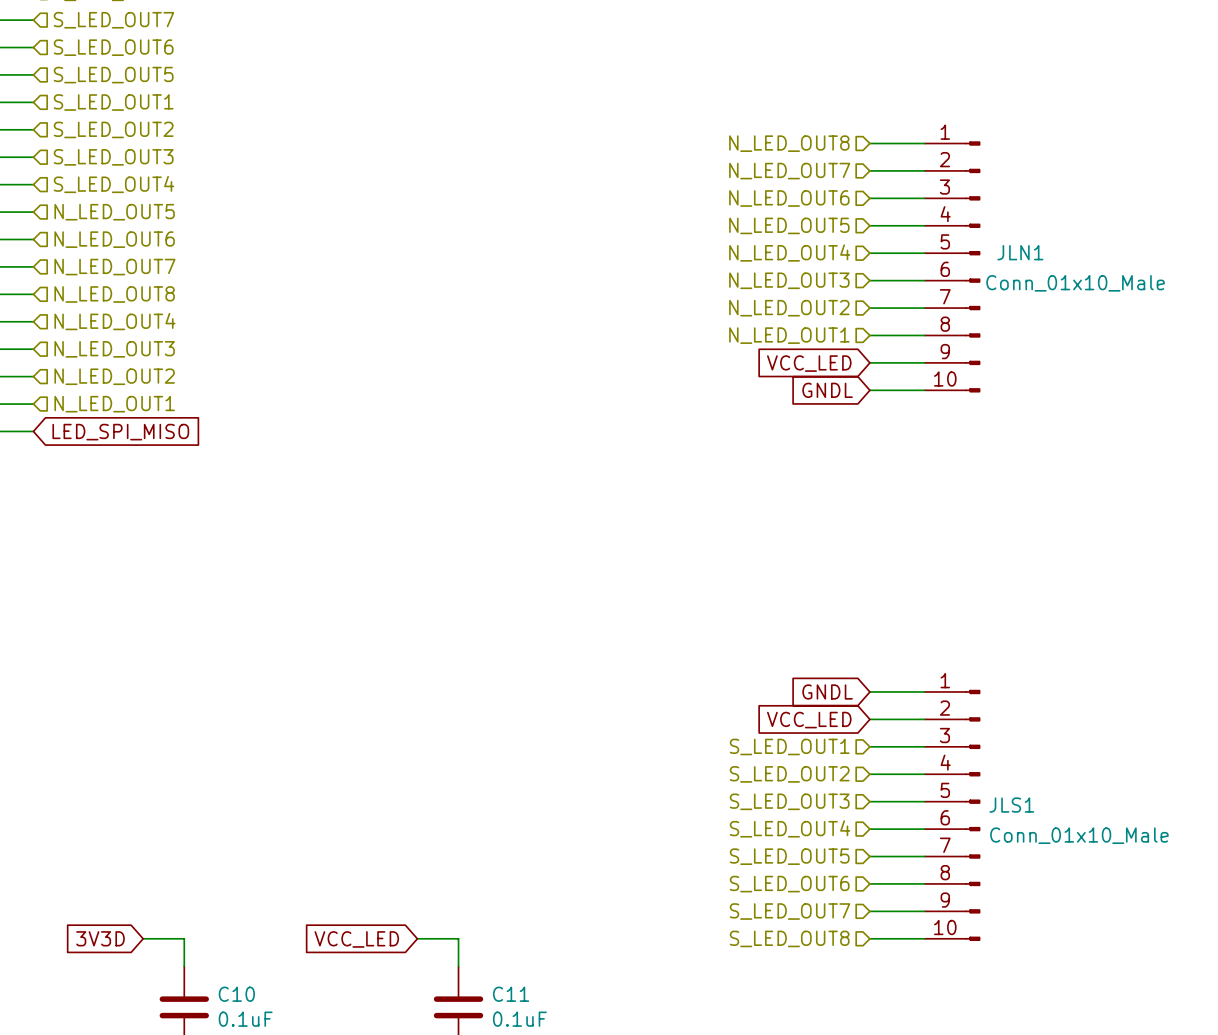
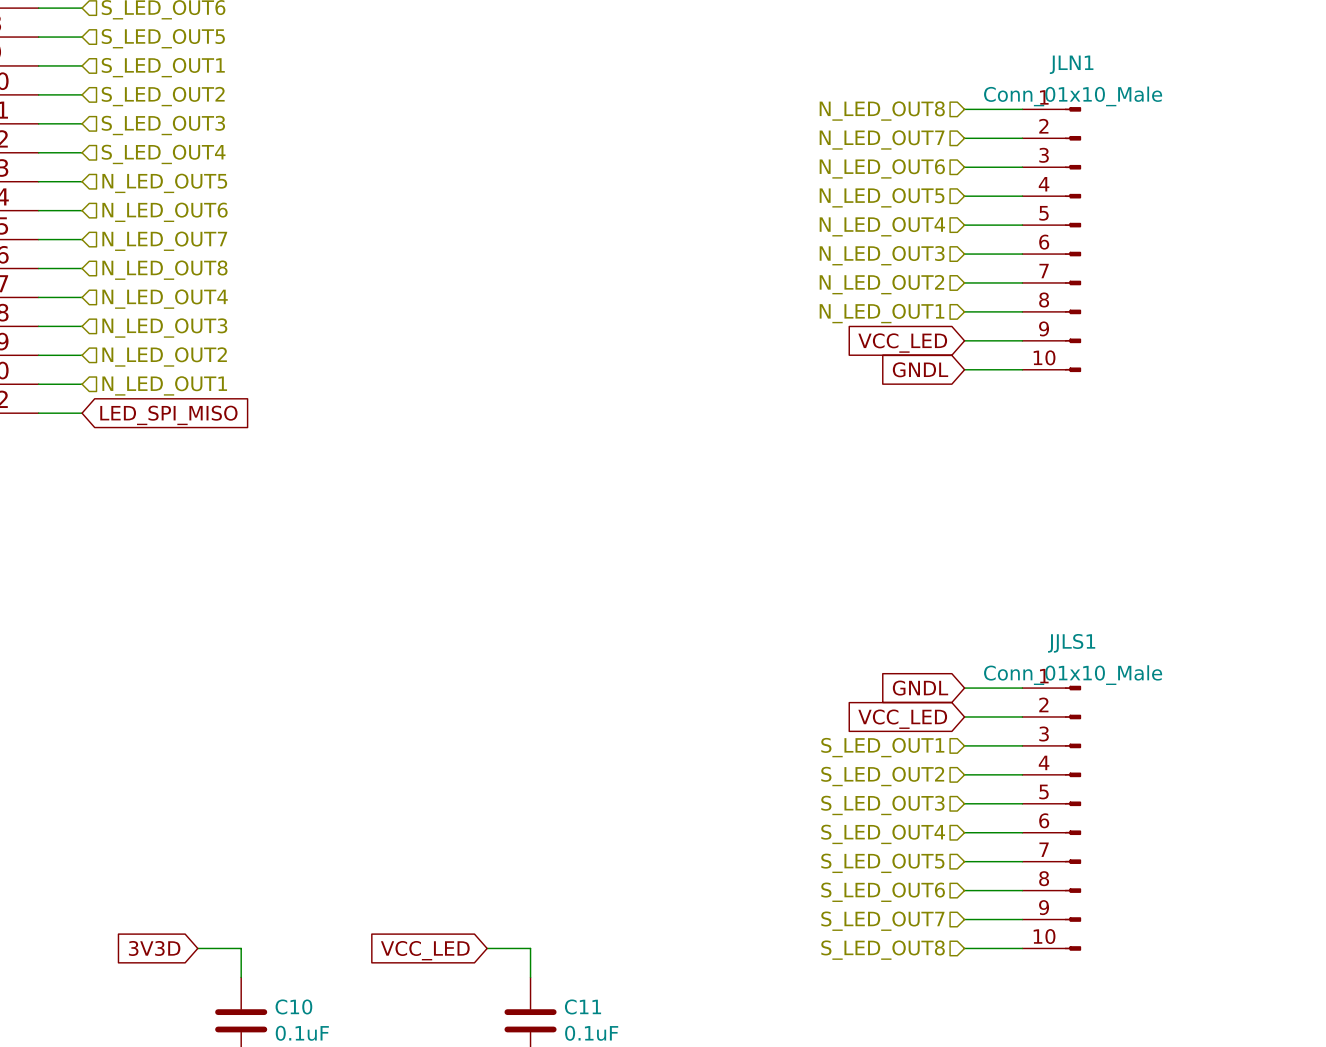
JLN1 name position: JLN1 (1020, 252) -> JLN1 (1071, 64)
JLN1 value position: Conn_01x10_Male (1075, 283) -> Conn_01x10_Male (1073, 96)
JLS1 name: JLS1 (1011, 805) -> JJLS1 (1071, 643)
JLS1 value position: Conn_01x10_Male (1079, 835) -> Conn_01x10_Male (1073, 675)

